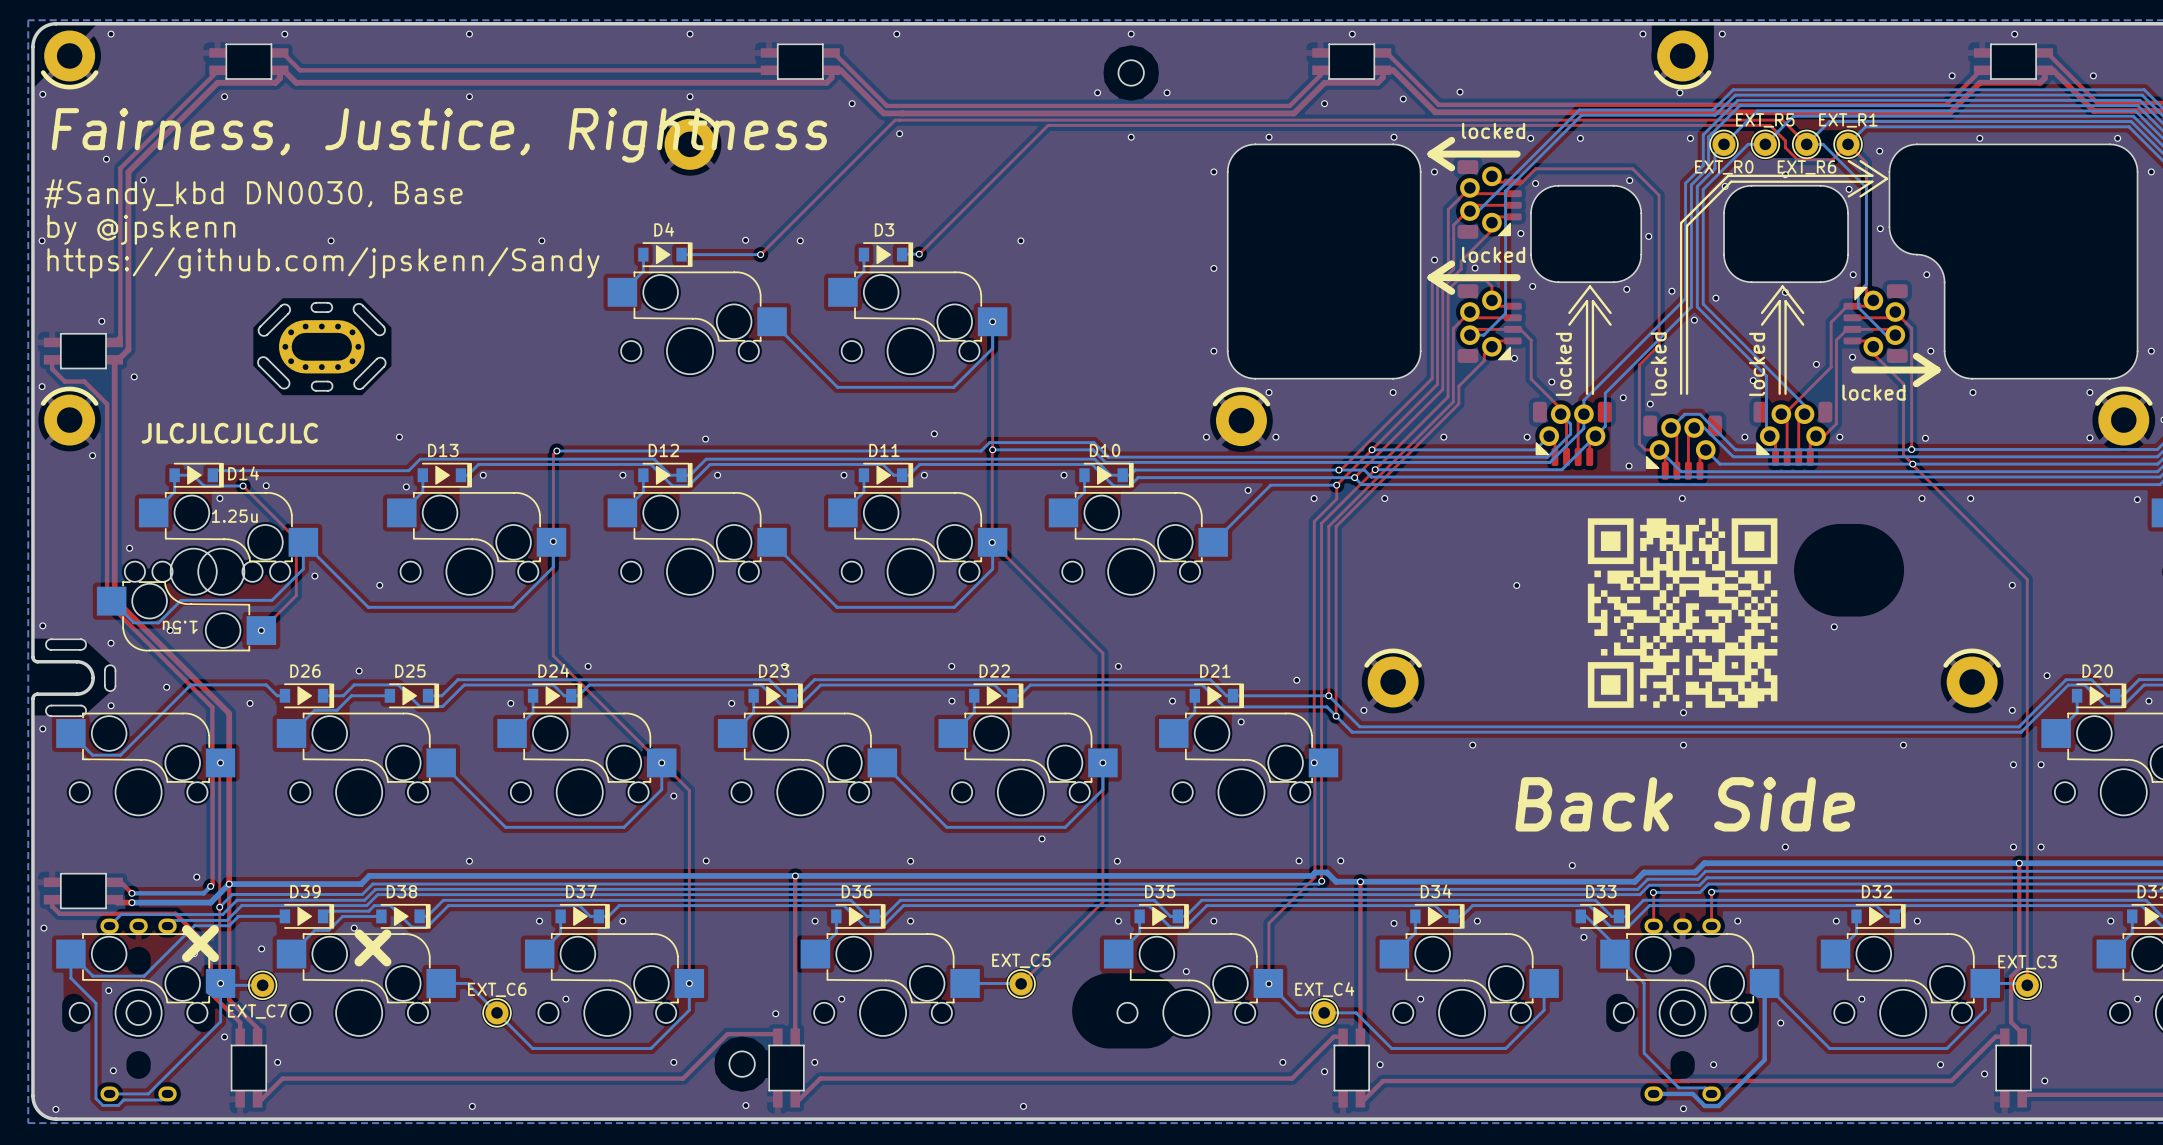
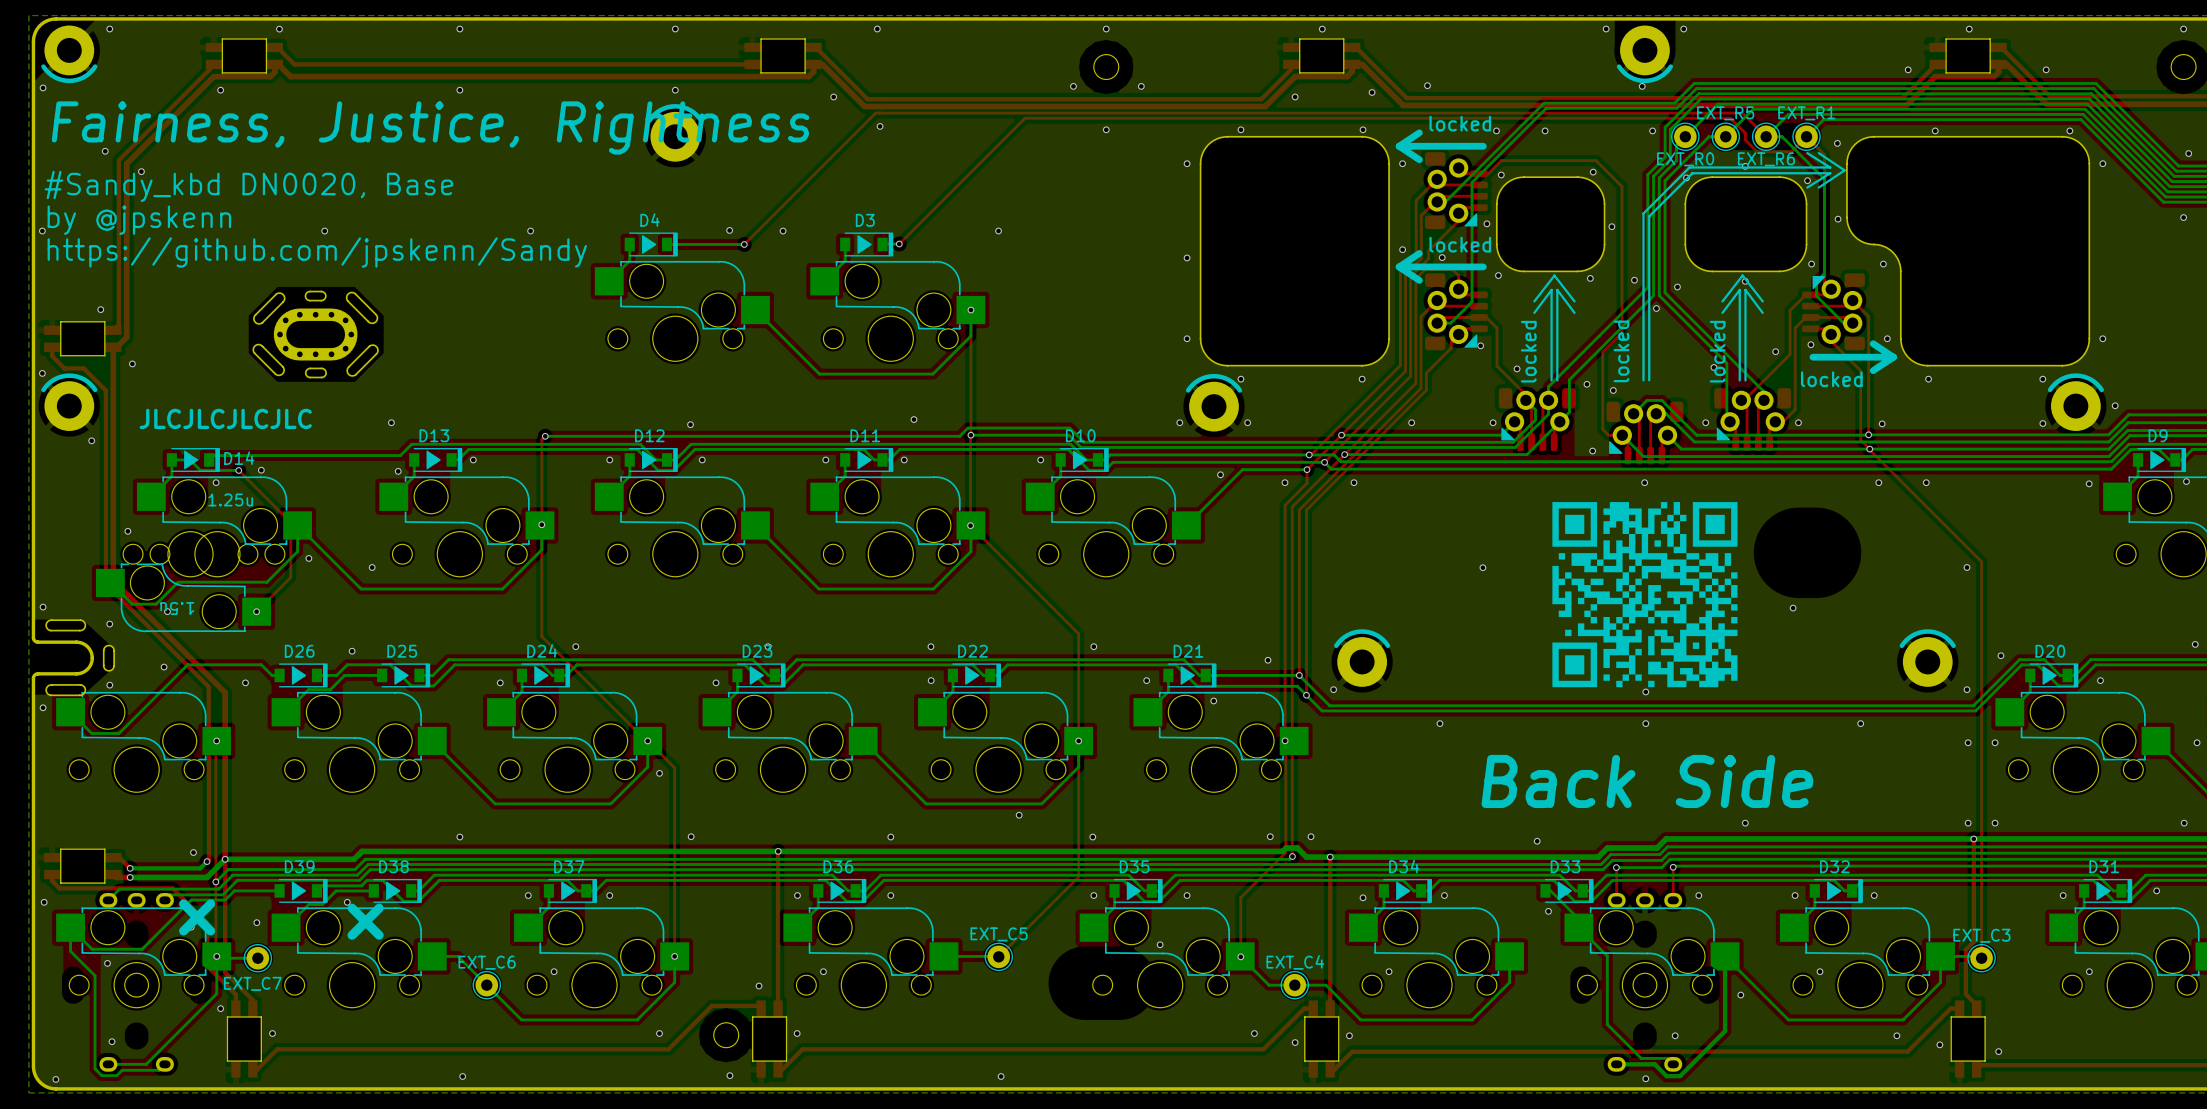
text: #Sandy_kbd DN0030, Base (253, 195) -> #Sandy_kbd DN0020, Base (248, 186)

